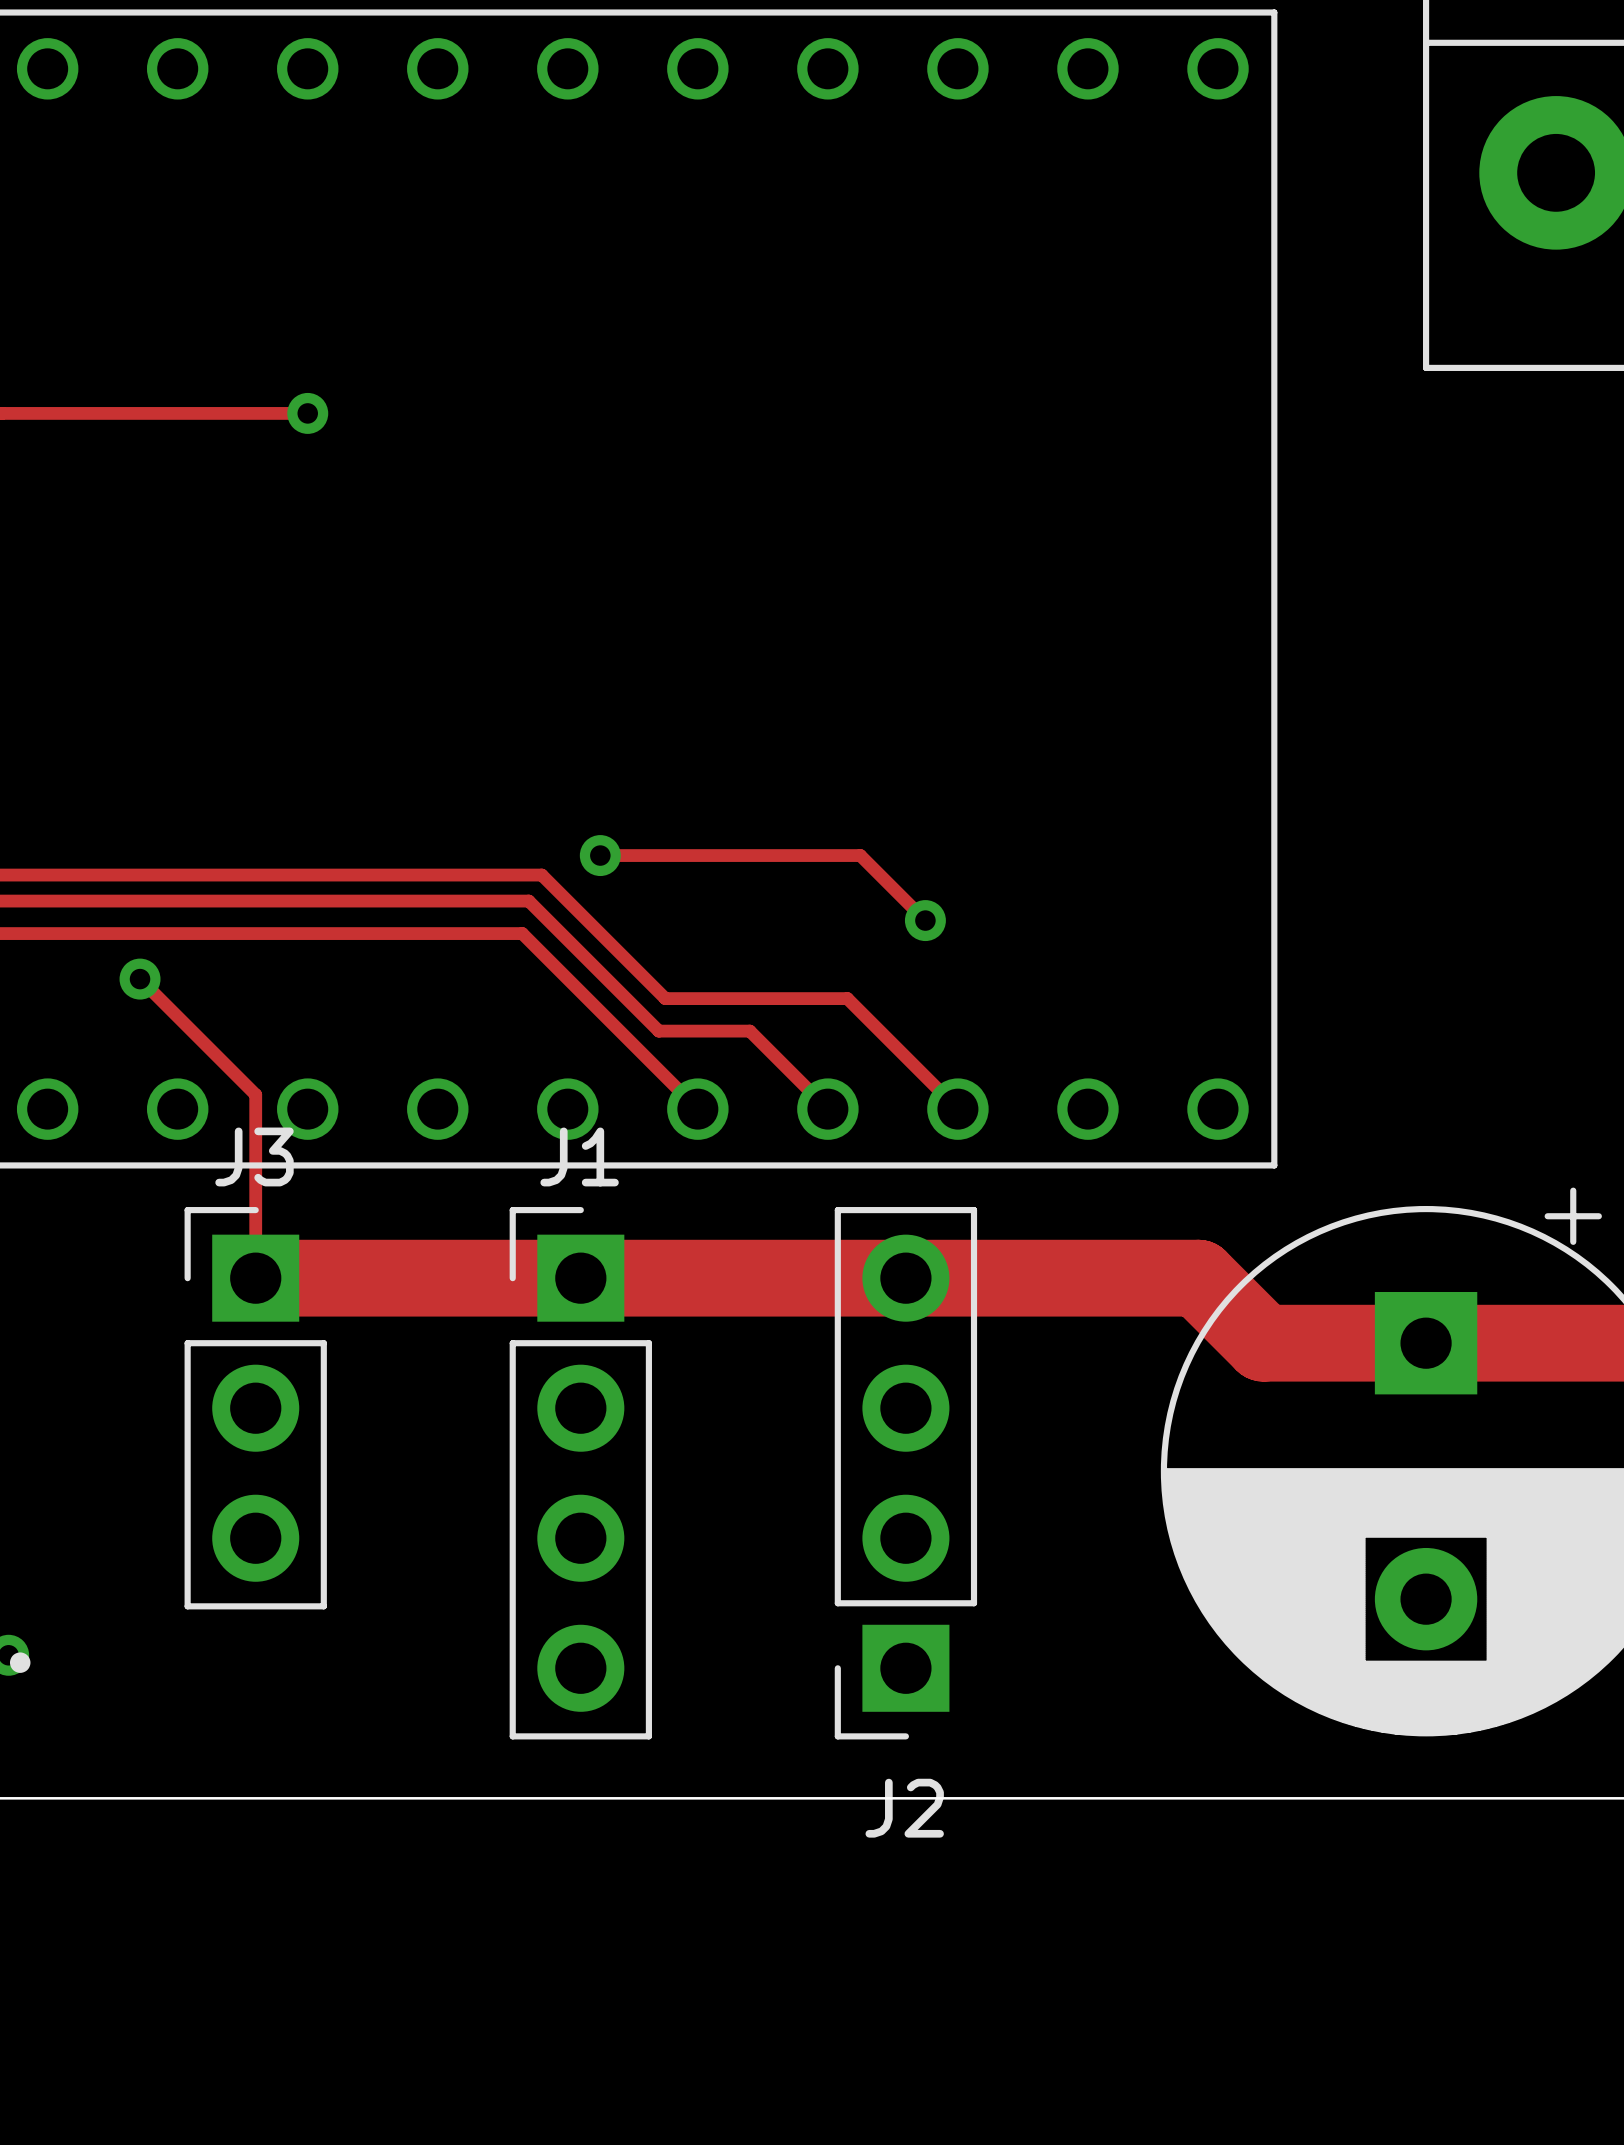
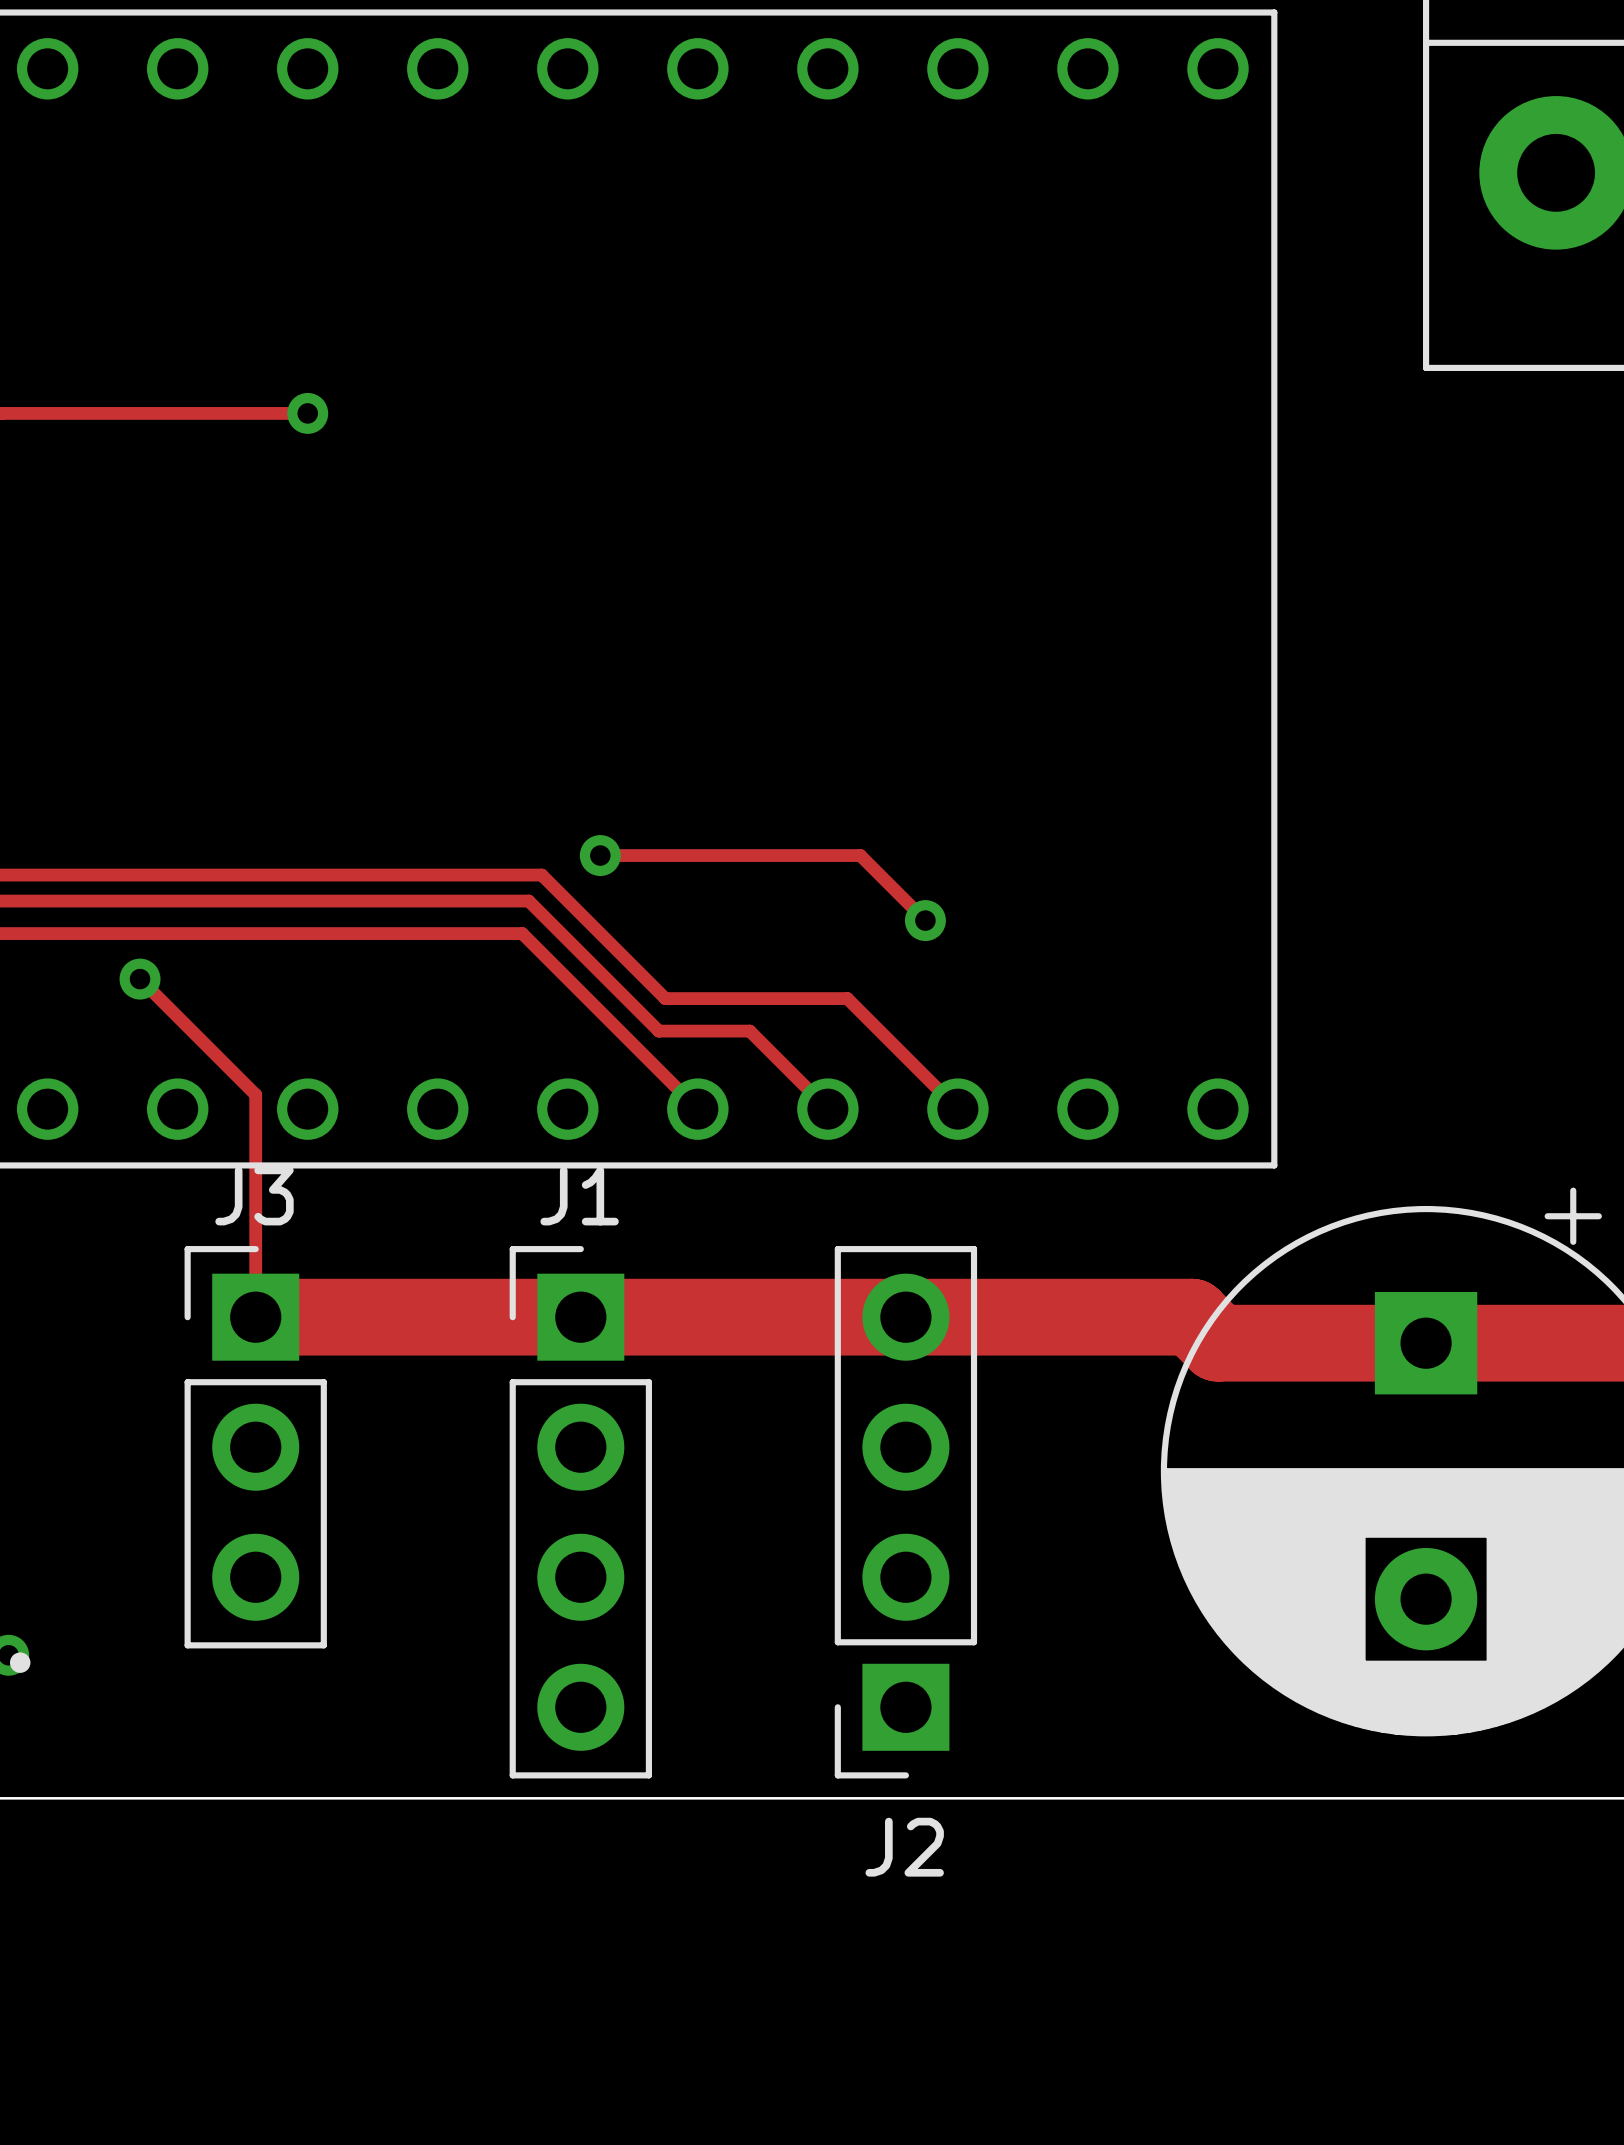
track: (255, 1278) (1198, 1278) (1263, 1343) -> (255, 1278) (255, 1317) (1192, 1317) (1218, 1343) (1263, 1343)
J3 position: (255, 1408) -> (255, 1447)
J1 position: (580, 1473) -> (580, 1512)
J2 position: (905, 1473) -> (905, 1512)

